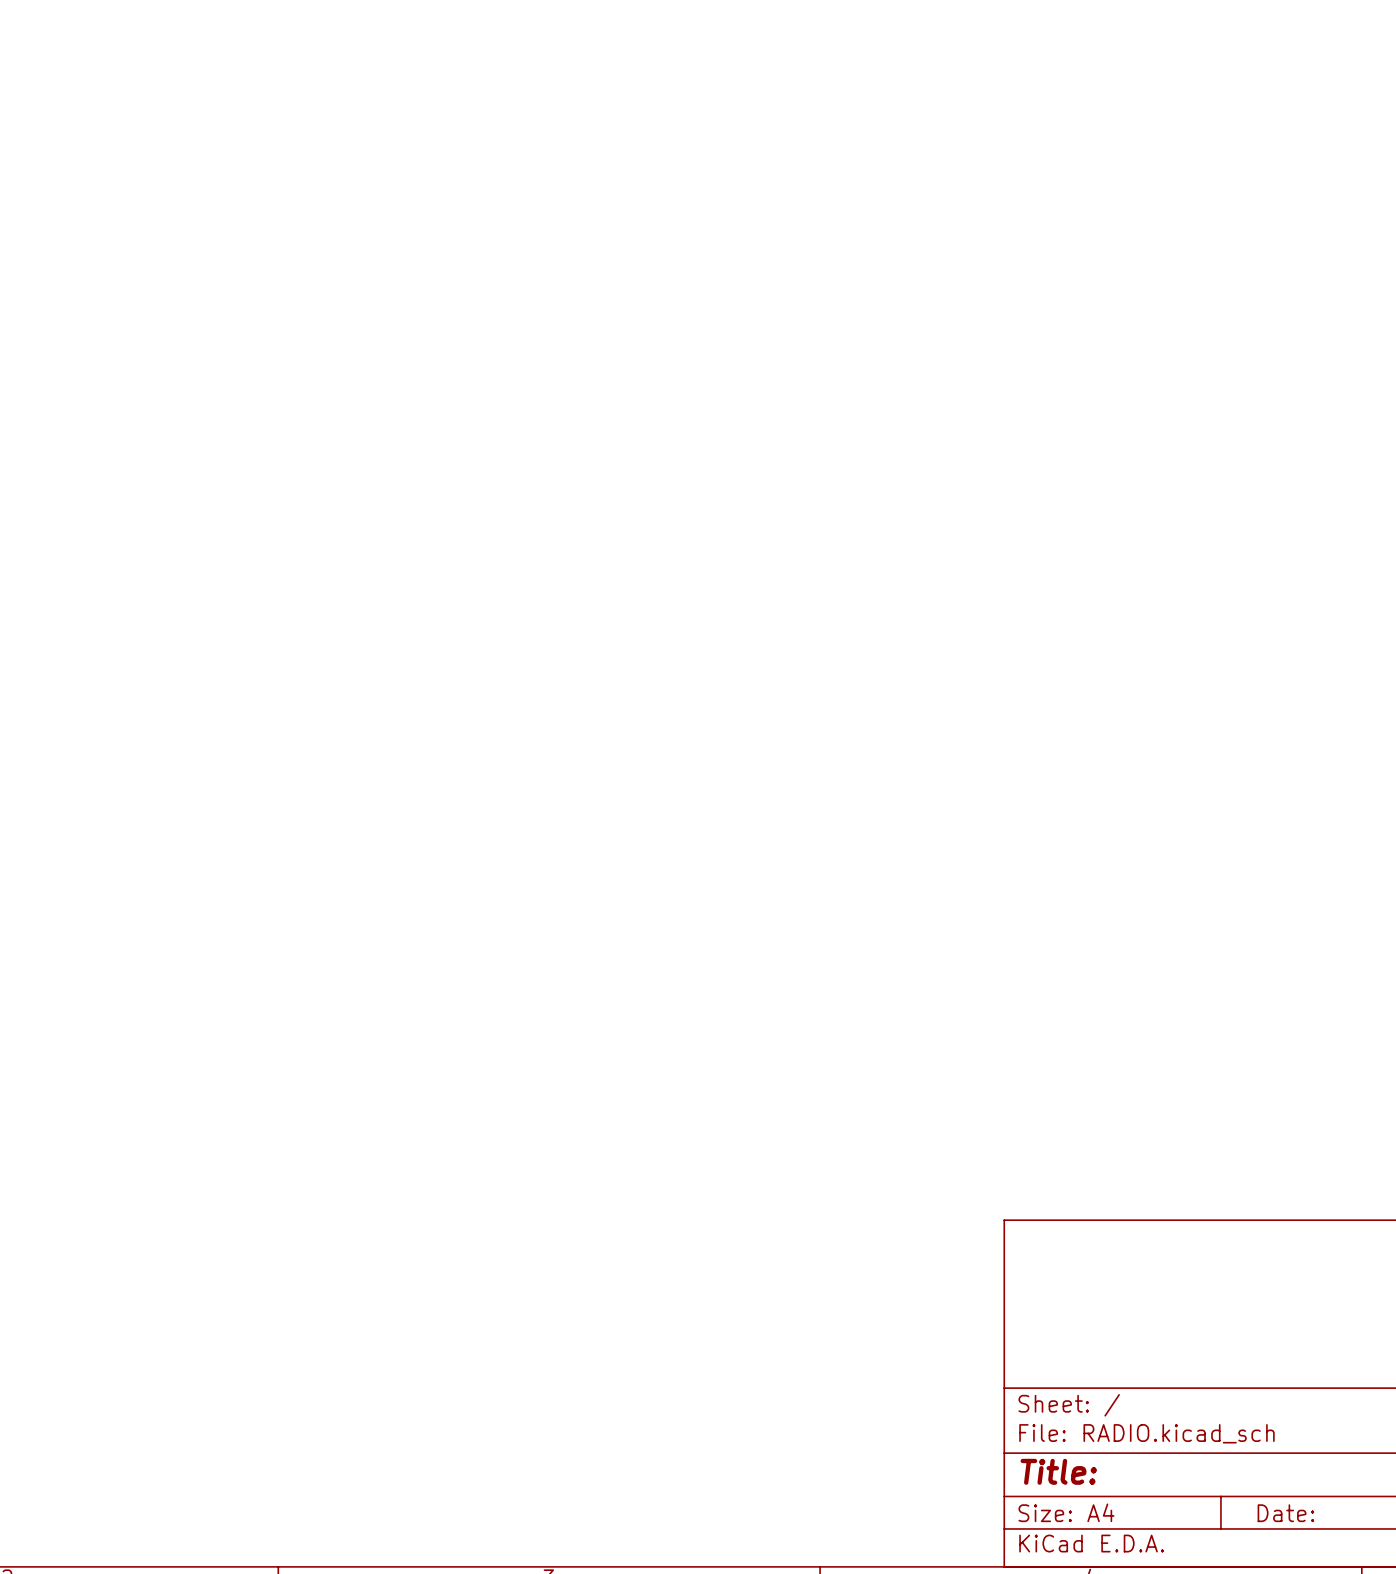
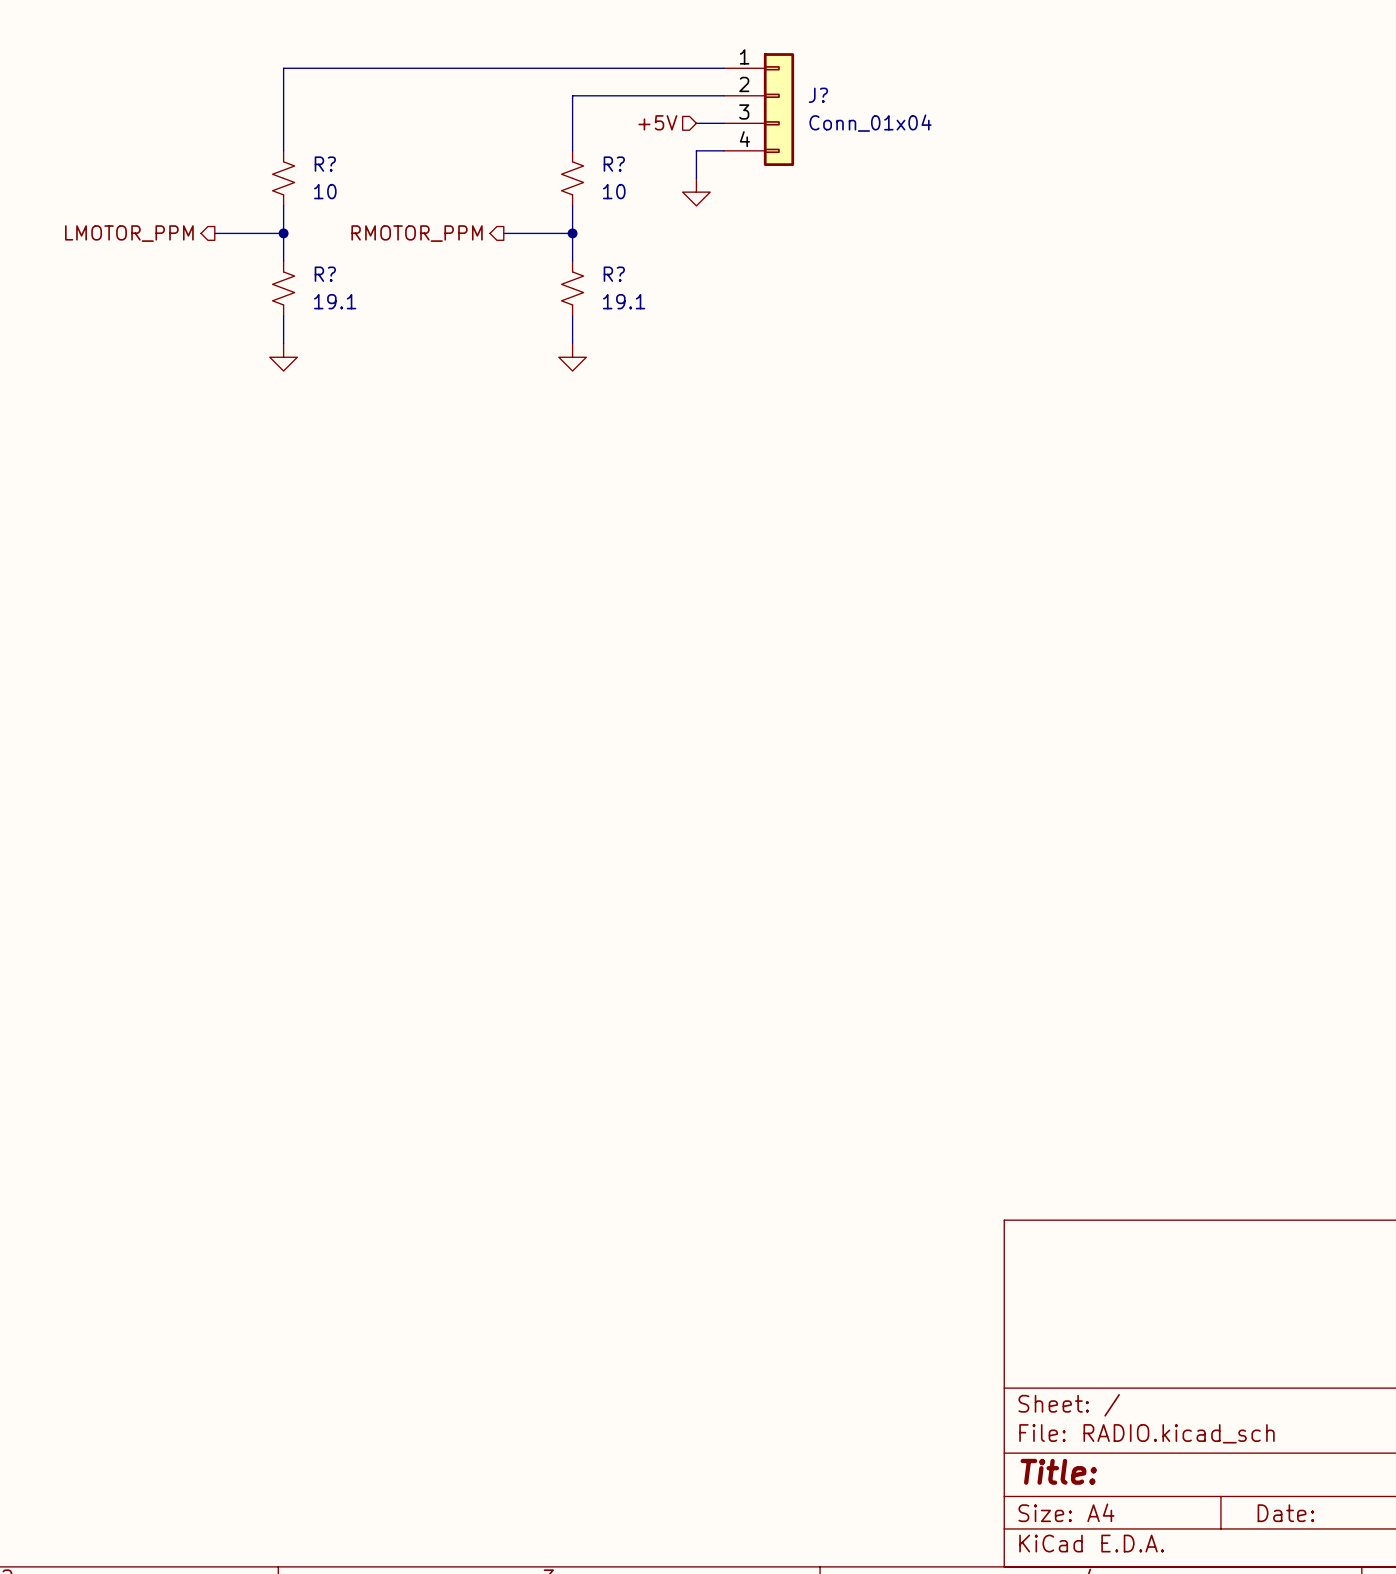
wire: none -> (723, 68) (283, 68) (283, 150)
wire: none -> (723, 95) (572, 95) (572, 150)
J?: none -> Conn_01x04 (759, 109)
hierarchical label: none -> +5V (657, 122)
wire: none -> (696, 123) (723, 123)
wire: none -> (723, 150) (696, 150) (696, 178)
R?: none -> 10 (283, 178)
R?: none -> 10 (572, 178)
power symbol: none -> (696, 192)
wire: none -> (283, 205) (283, 260)
wire: none -> (572, 205) (572, 260)
hierarchical label: none -> LMOTOR_PPM (129, 233)
wire: none -> (214, 233) (283, 233)
junction: none -> (283, 233)
hierarchical label: none -> RMOTOR_PPM (417, 233)
wire: none -> (503, 233) (572, 233)
junction: none -> (572, 233)
R?: none -> 19.1 (283, 288)
R?: none -> 19.1 (572, 288)
wire: none -> (283, 315) (283, 343)
wire: none -> (572, 315) (572, 343)
power symbol: none -> (283, 357)
power symbol: none -> (572, 357)

